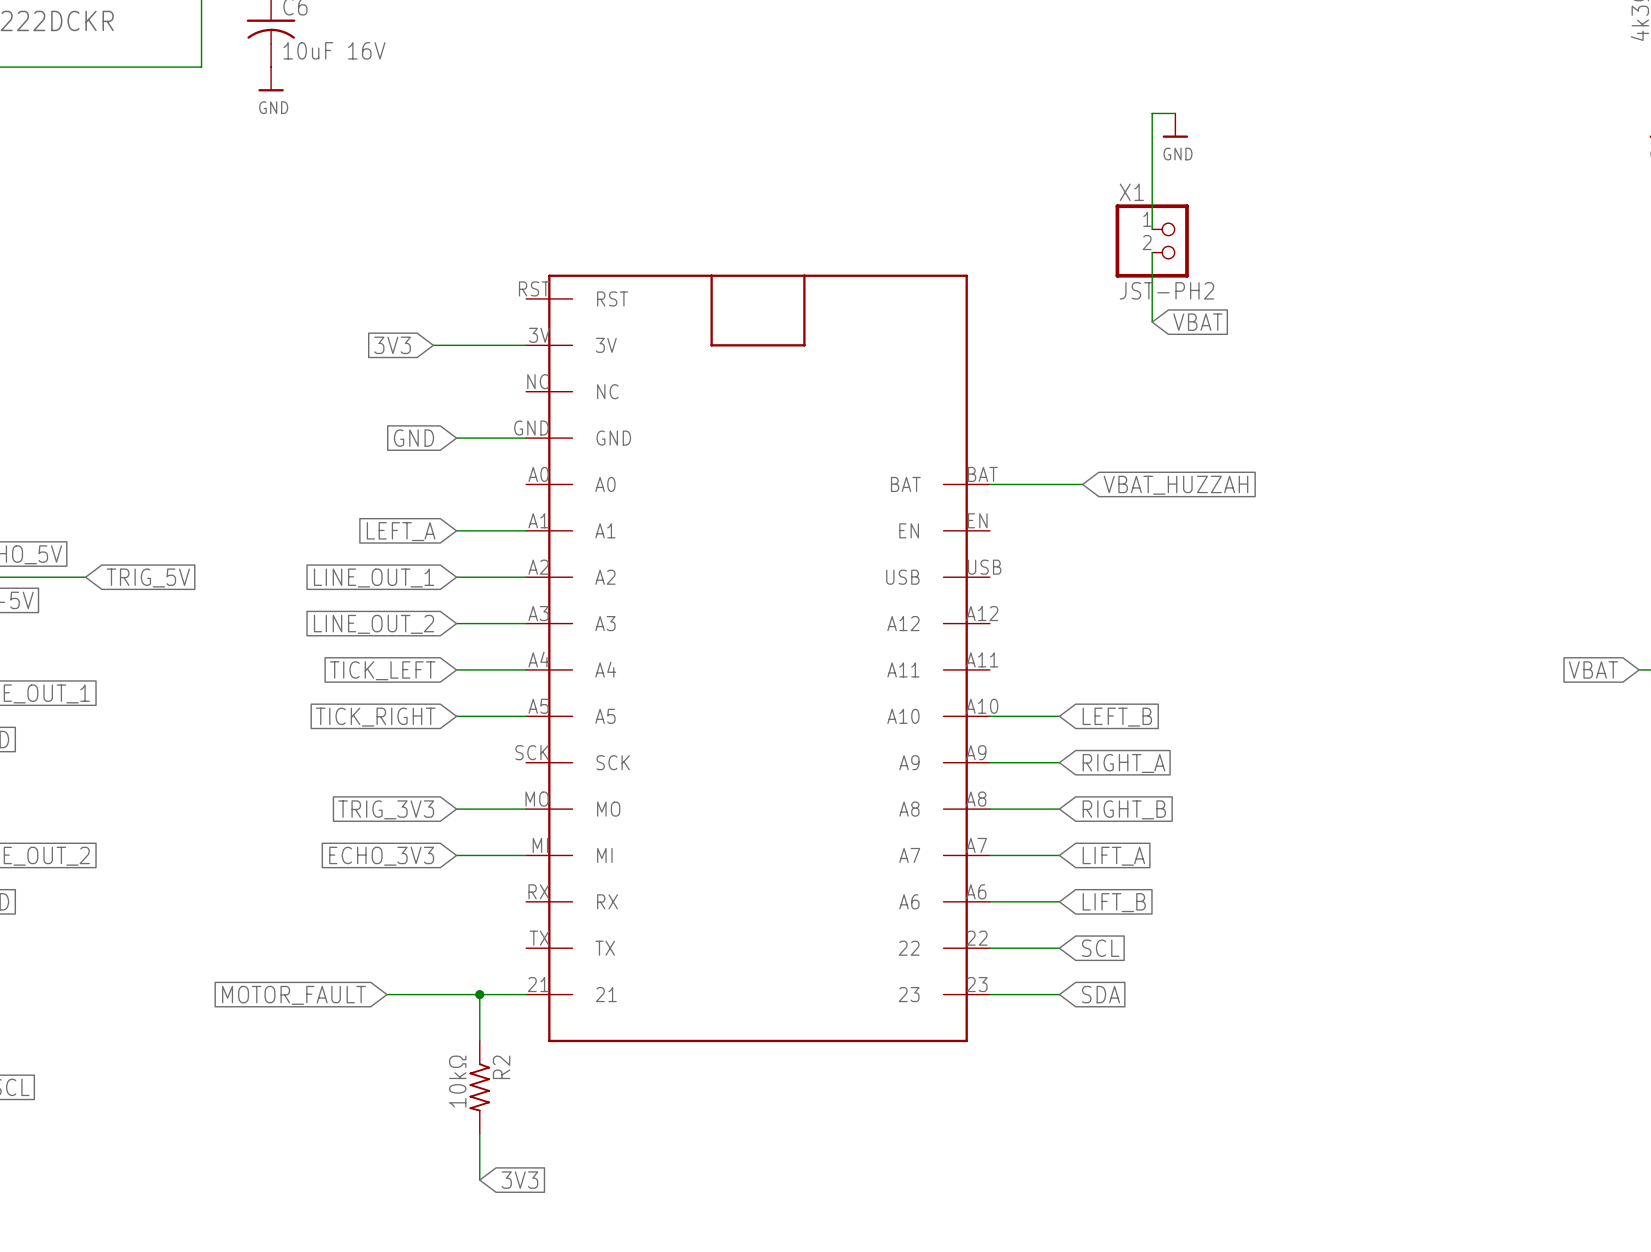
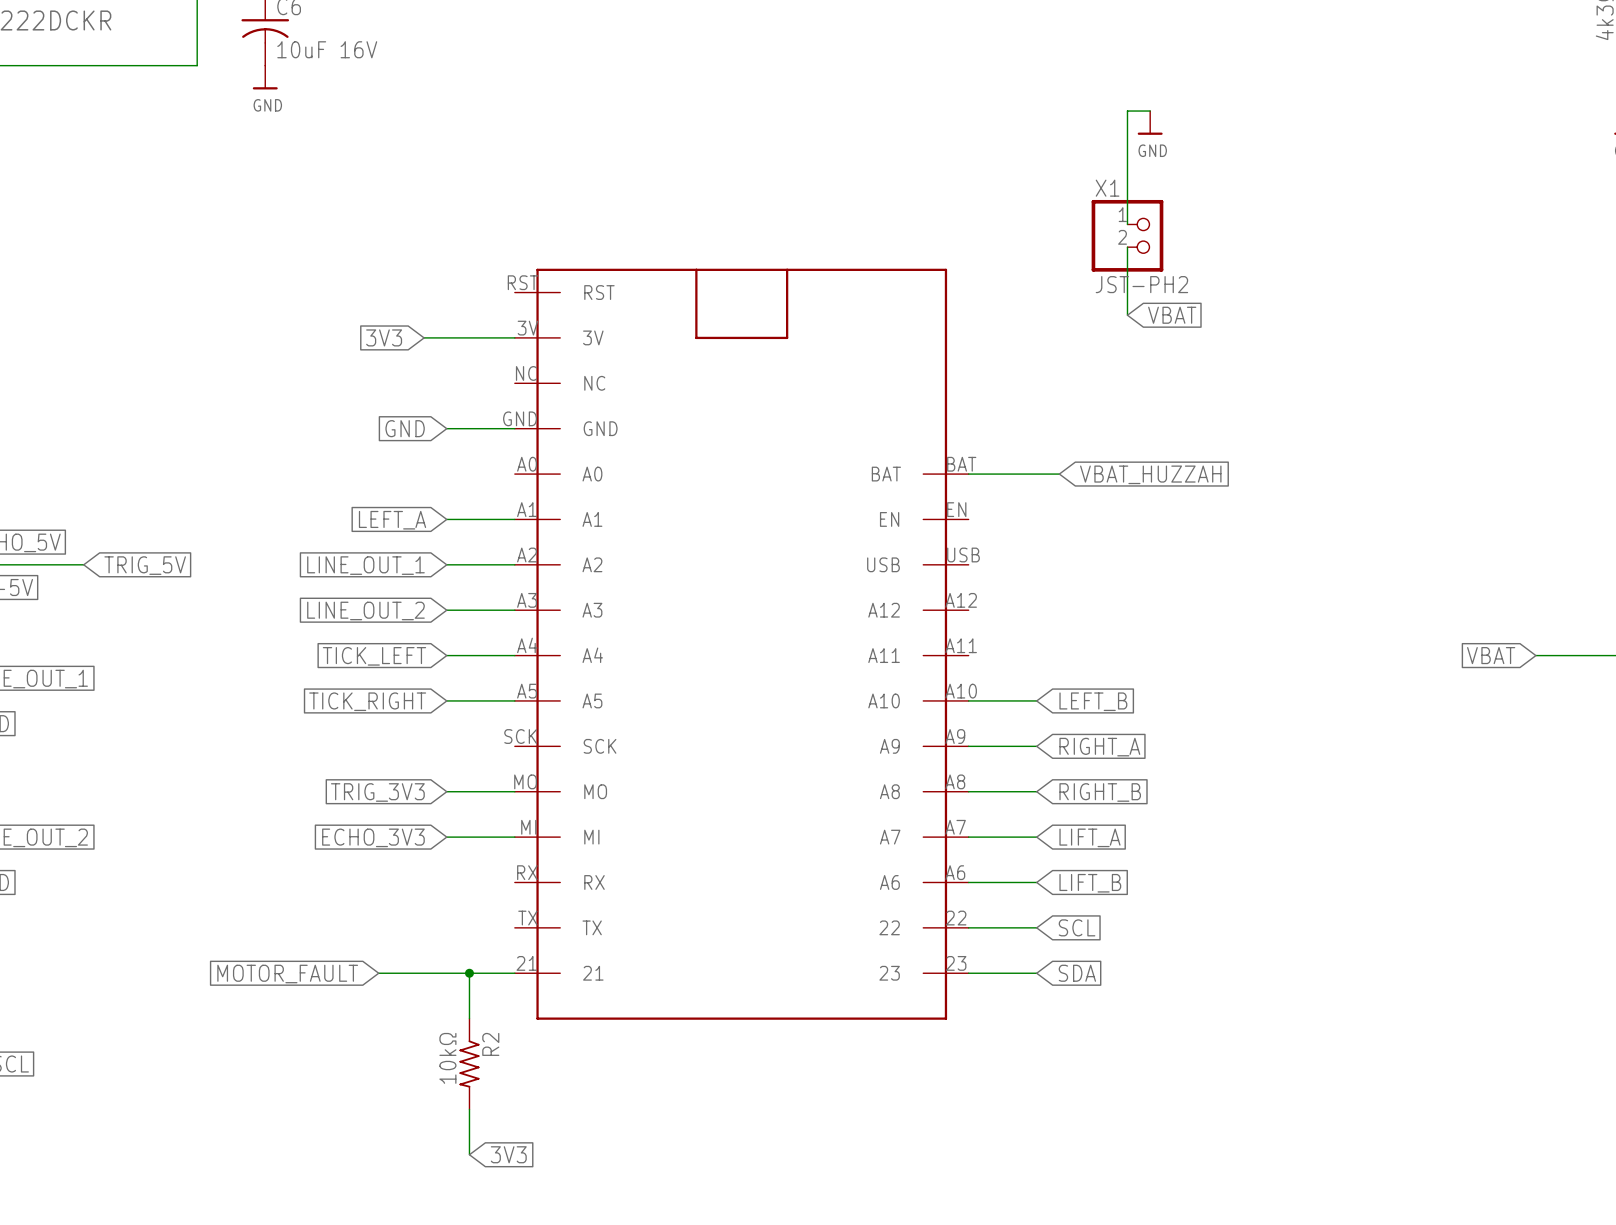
wire: none -> (1535, 655) (1603, 655)
global label position: VBAT (1593, 669) -> VBAT (1491, 655)

